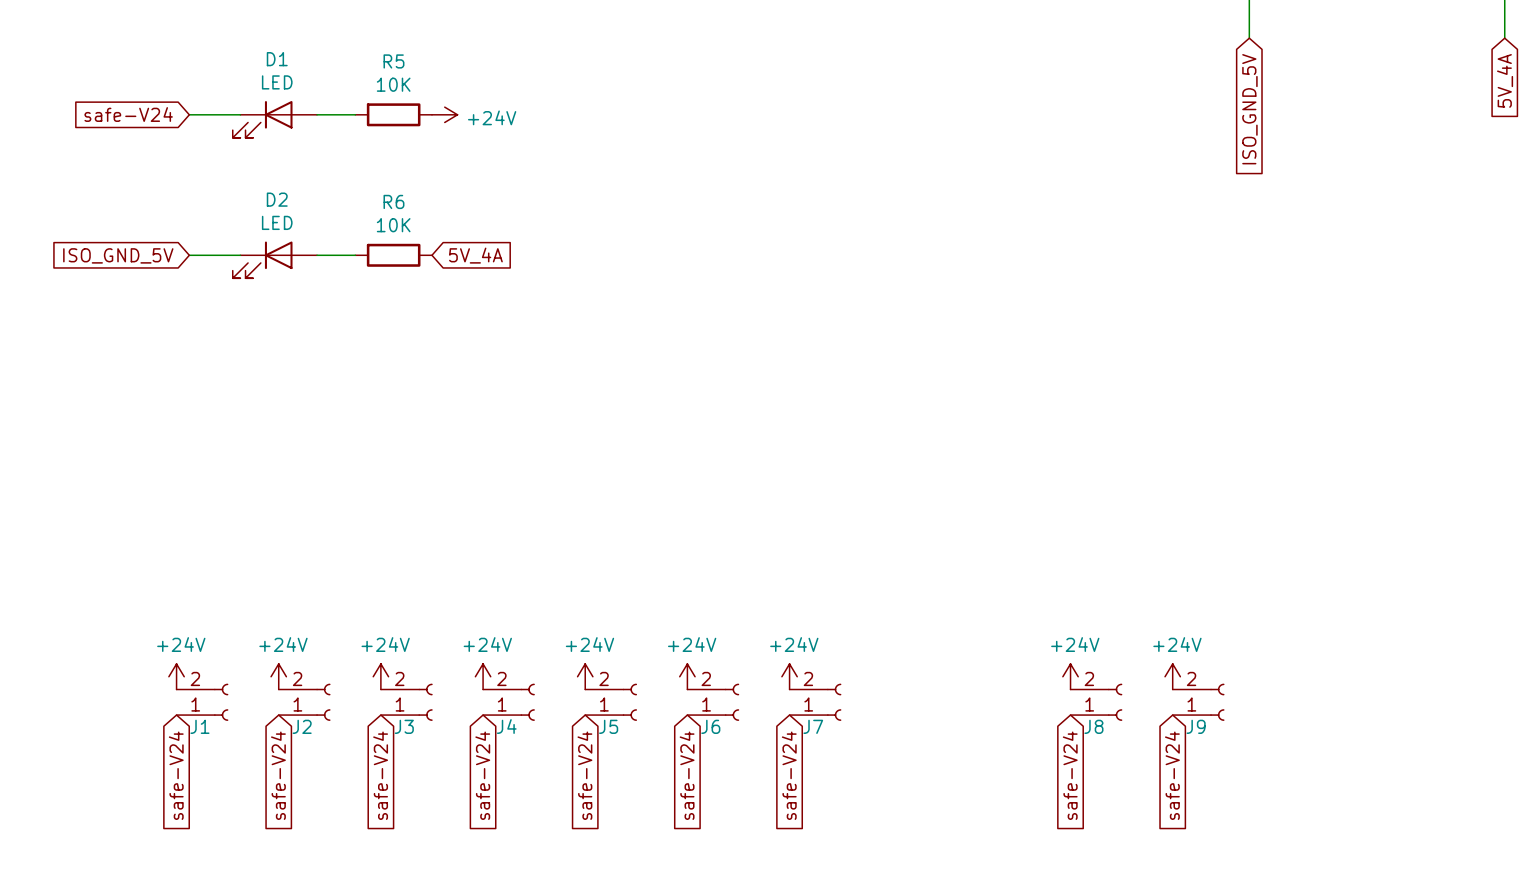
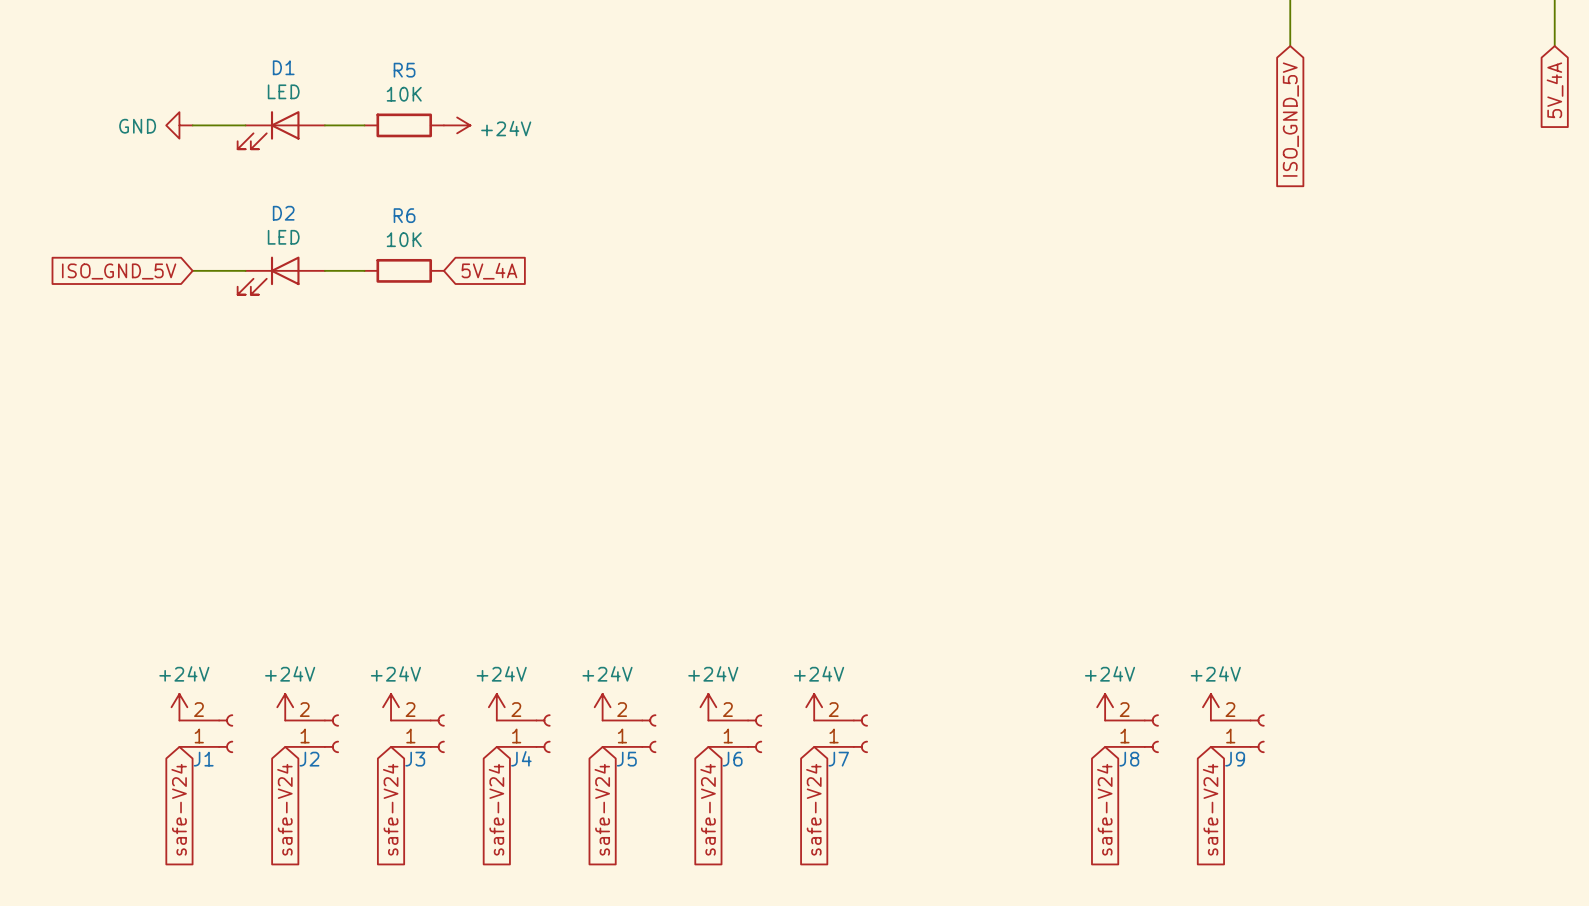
global label: safe-V24 (128, 114) -> none
power symbol: none -> GND (179, 125)

